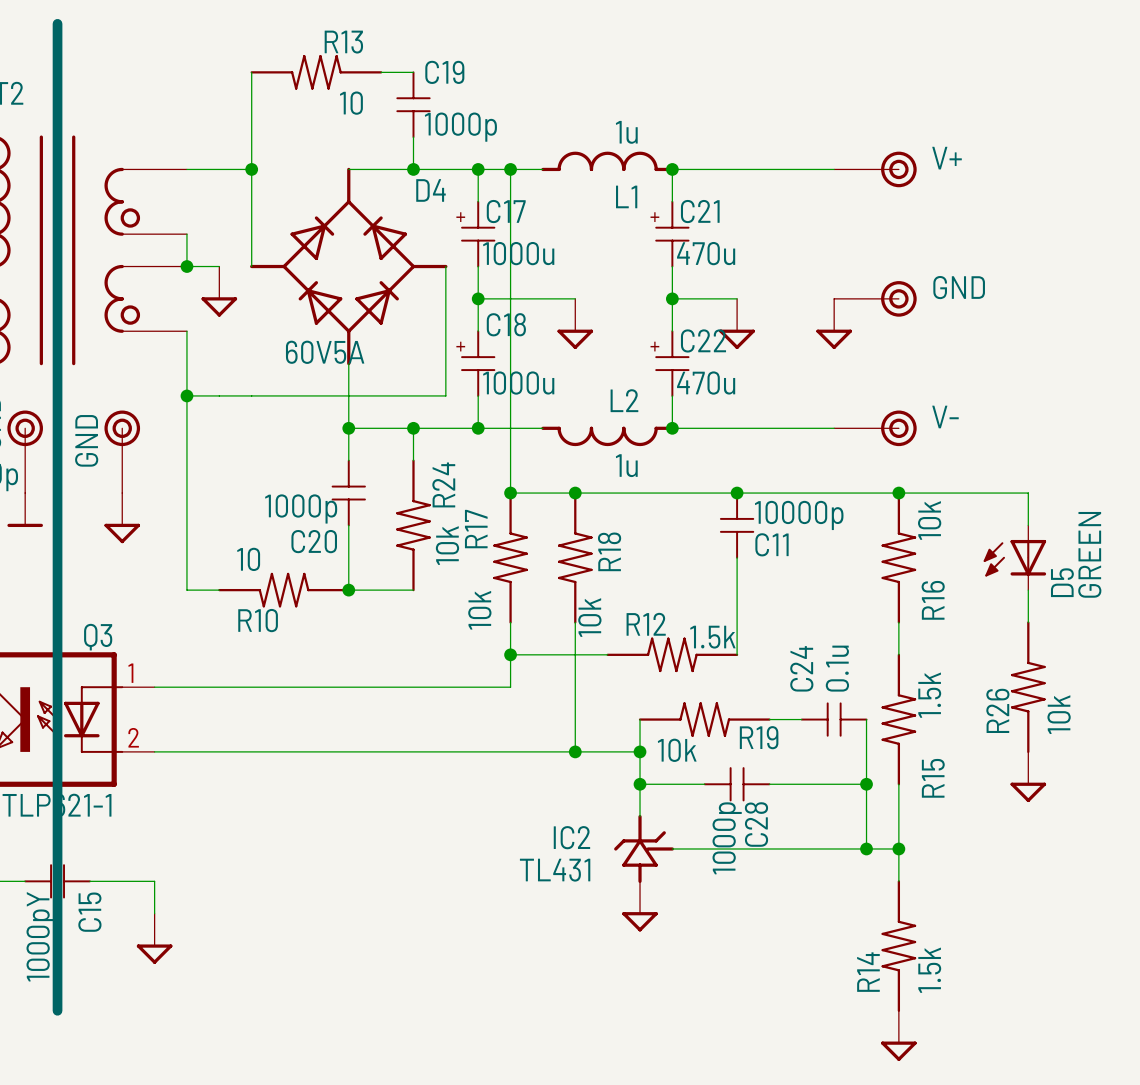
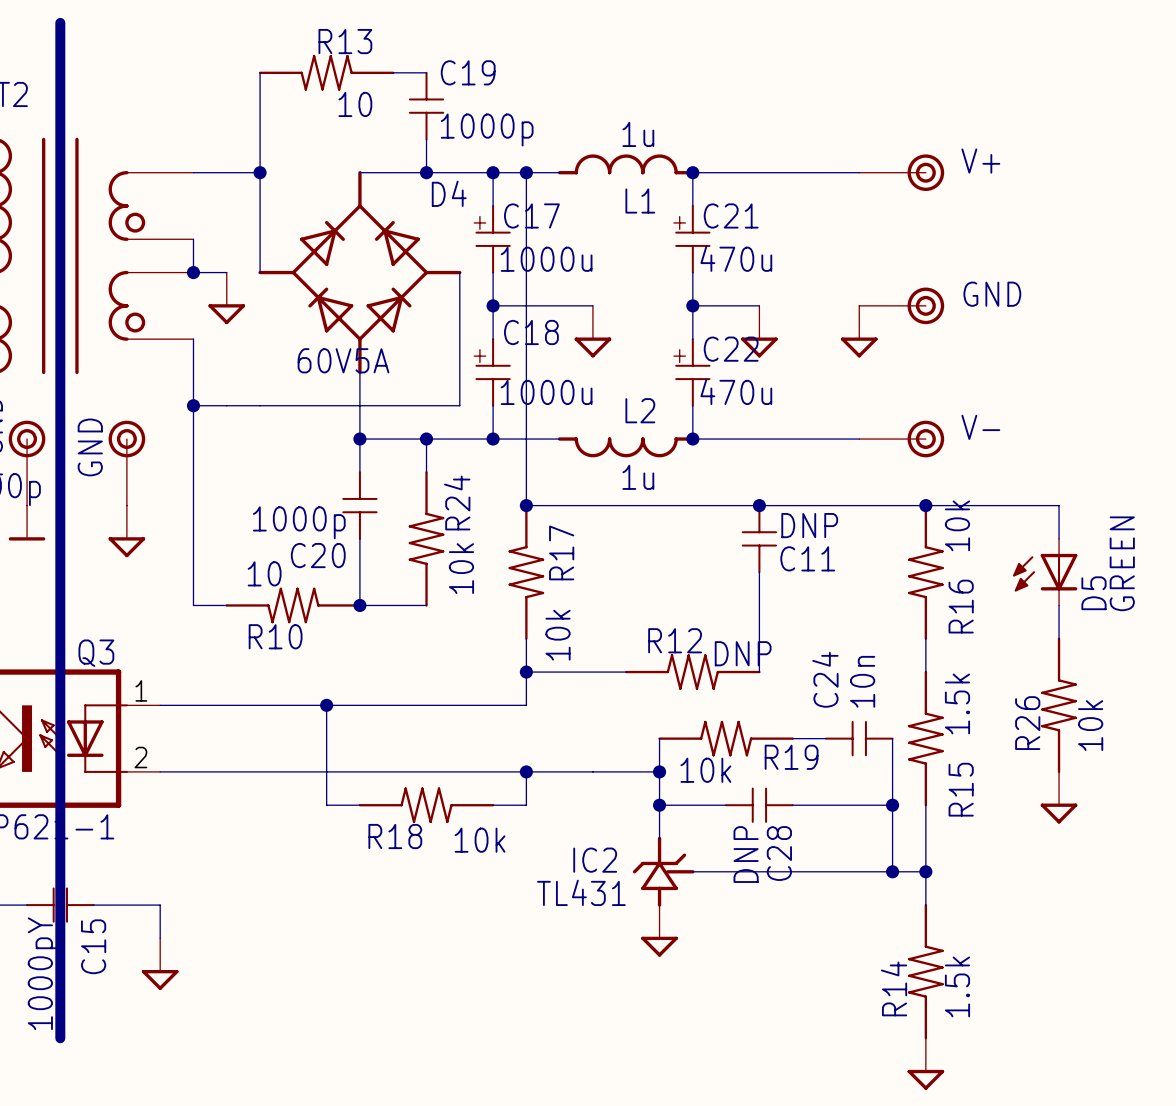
junction: (575, 493) -> none
C11 value: 10000p (799, 515) -> DNP (809, 525)
R18 name position: R18 (609, 551) -> R18 (395, 836)
R17 flip: as is (510, 557) -> left-right (526, 572)
R18 rotation: 0° (575, 557) -> 90° clockwise (426, 805)
R18 position: (575, 557) -> (426, 805)
R18 value position: 10k (589, 617) -> 10k (480, 840)
wire: (575, 622) (575, 751) -> none
R12 value: 1.5k (712, 637) -> DNP (743, 653)
C24 value: 0.1u (837, 668) -> 10n (862, 681)
wire: none -> (326, 705) (326, 805) (359, 805)
junction: none -> (326, 705)
wire: none -> (526, 771) (526, 805) (493, 805)
junction position: (575, 751) -> (526, 771)
C28 value: 1000p (727, 838) -> DNP (746, 854)

